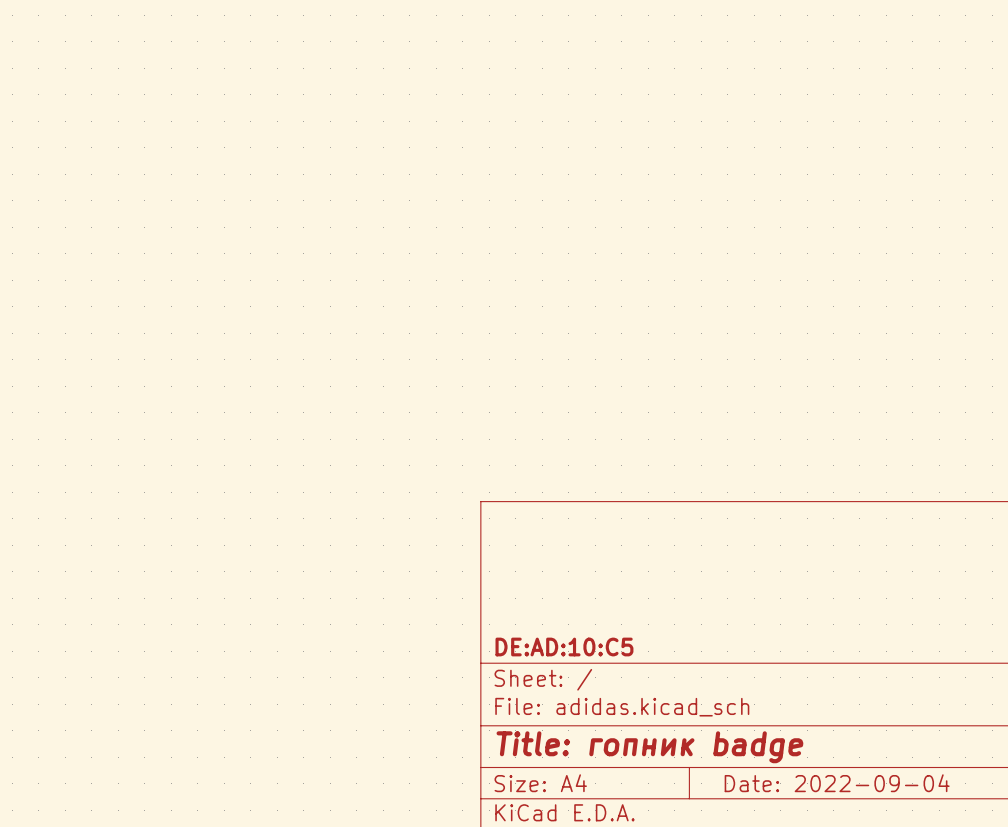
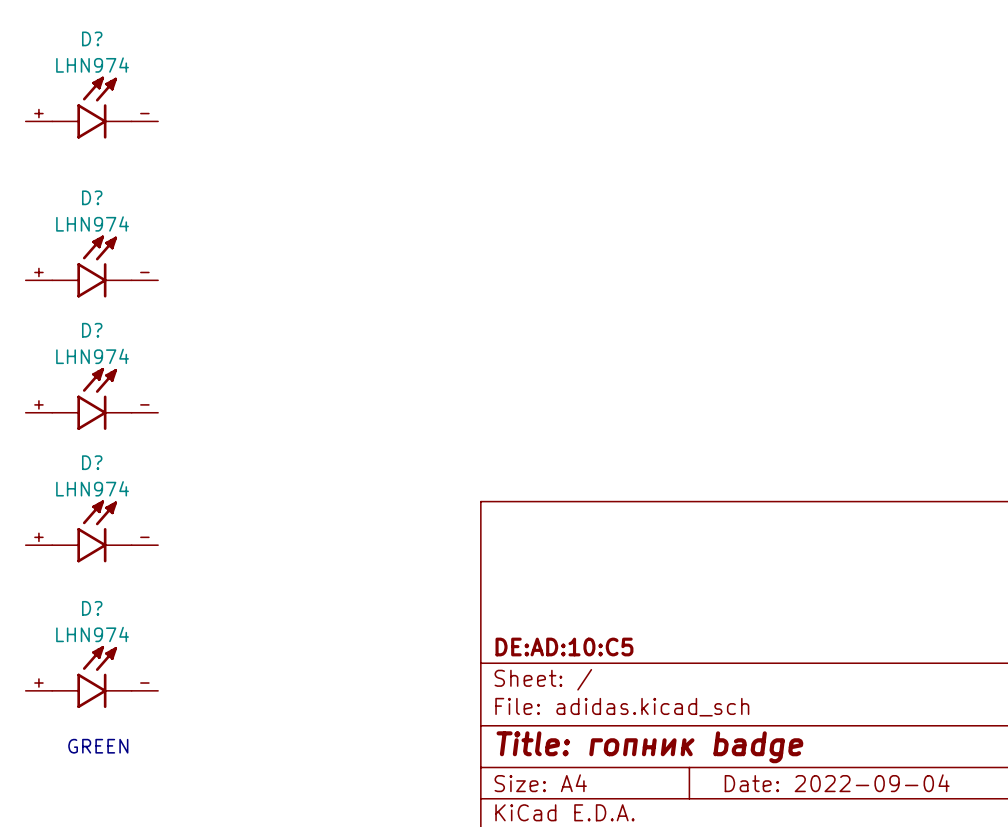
D?: none -> LHN974 (91, 107)
D?: none -> LHN974 (91, 266)
D?: none -> LHN974 (91, 398)
D?: none -> LHN974 (91, 531)
D?: none -> LHN974 (91, 677)
text: none -> GREEN (98, 746)

